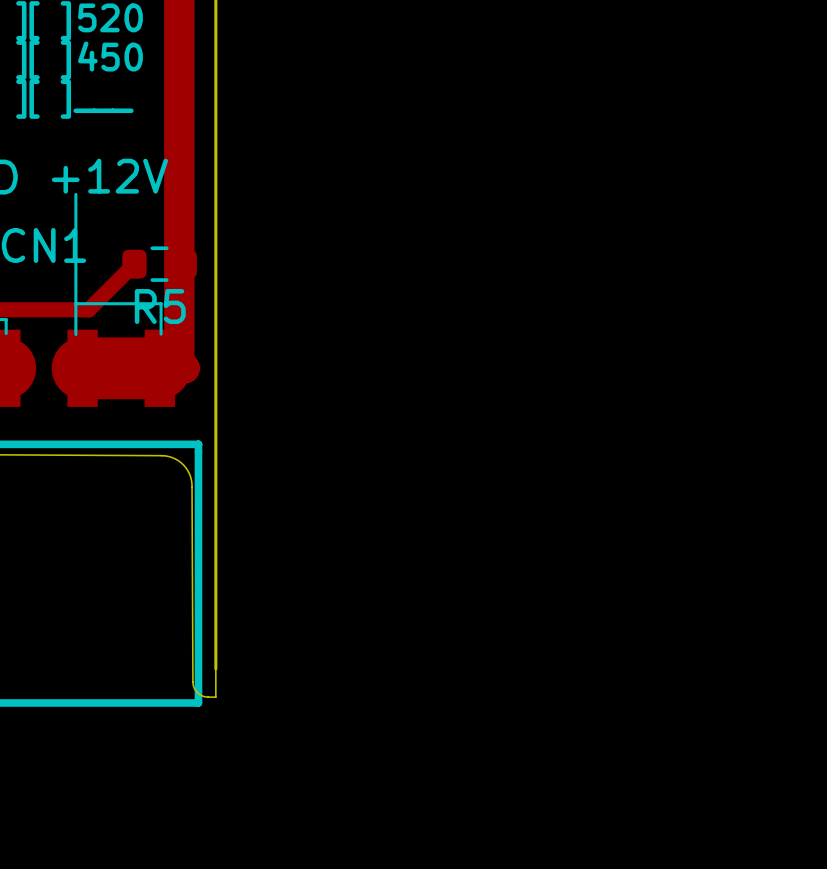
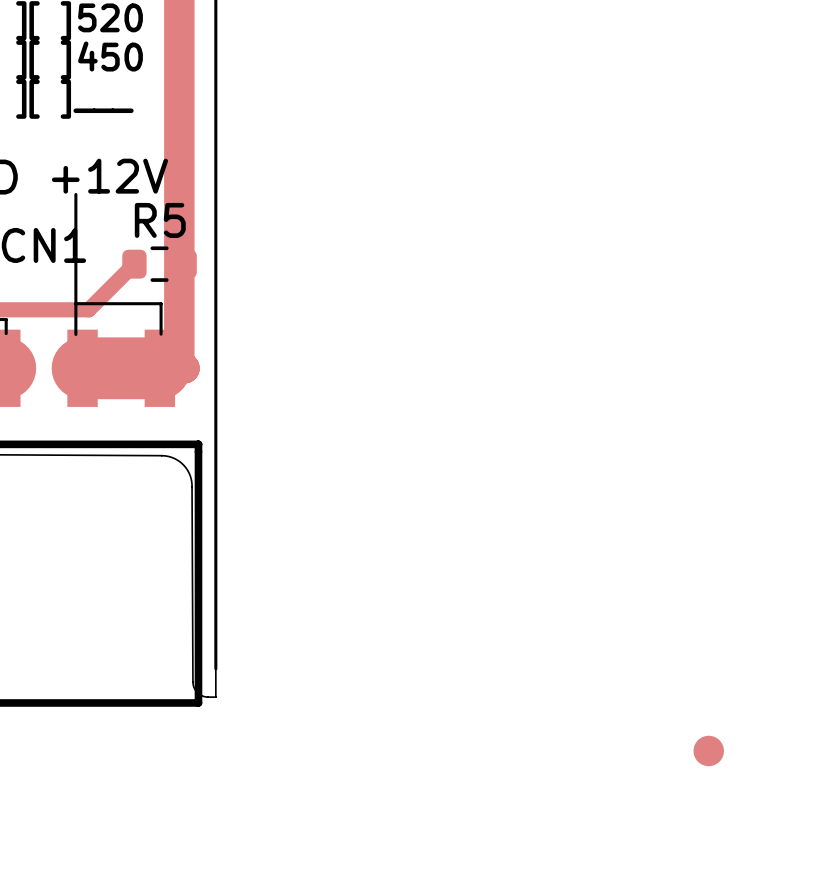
R5 name position: R5 (160, 306) -> R5 (160, 220)
part: none -> (708, 750)

